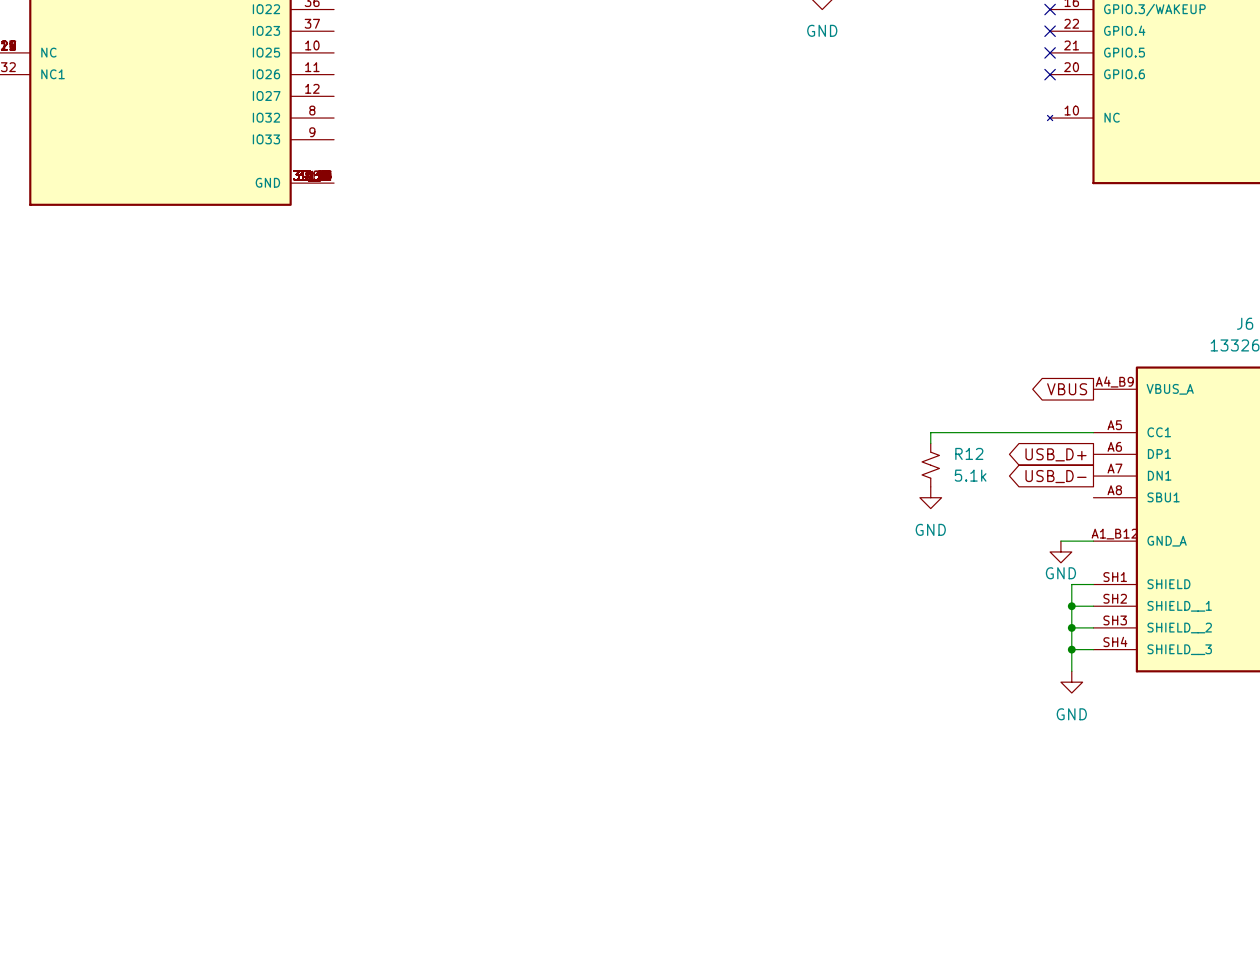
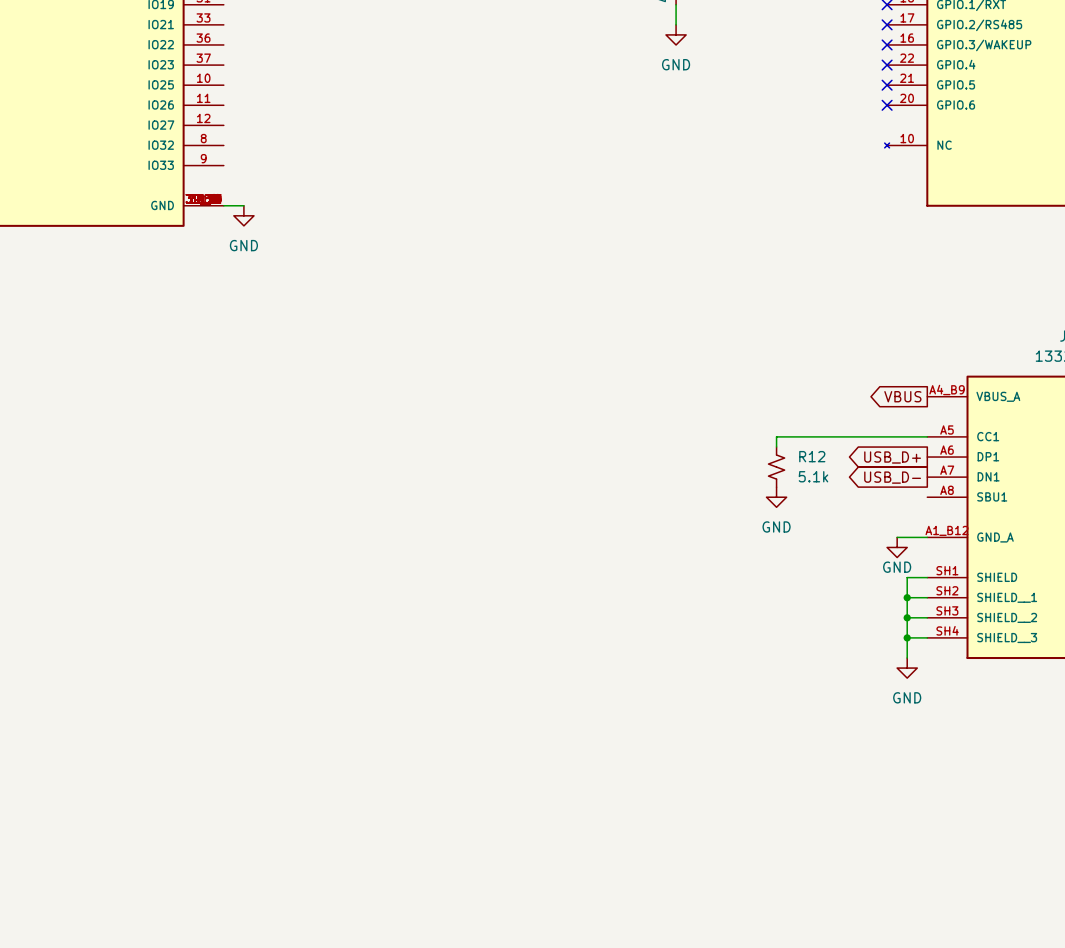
wire: none -> (223, 205) (243, 205)
power symbol: none -> GND (243, 215)

